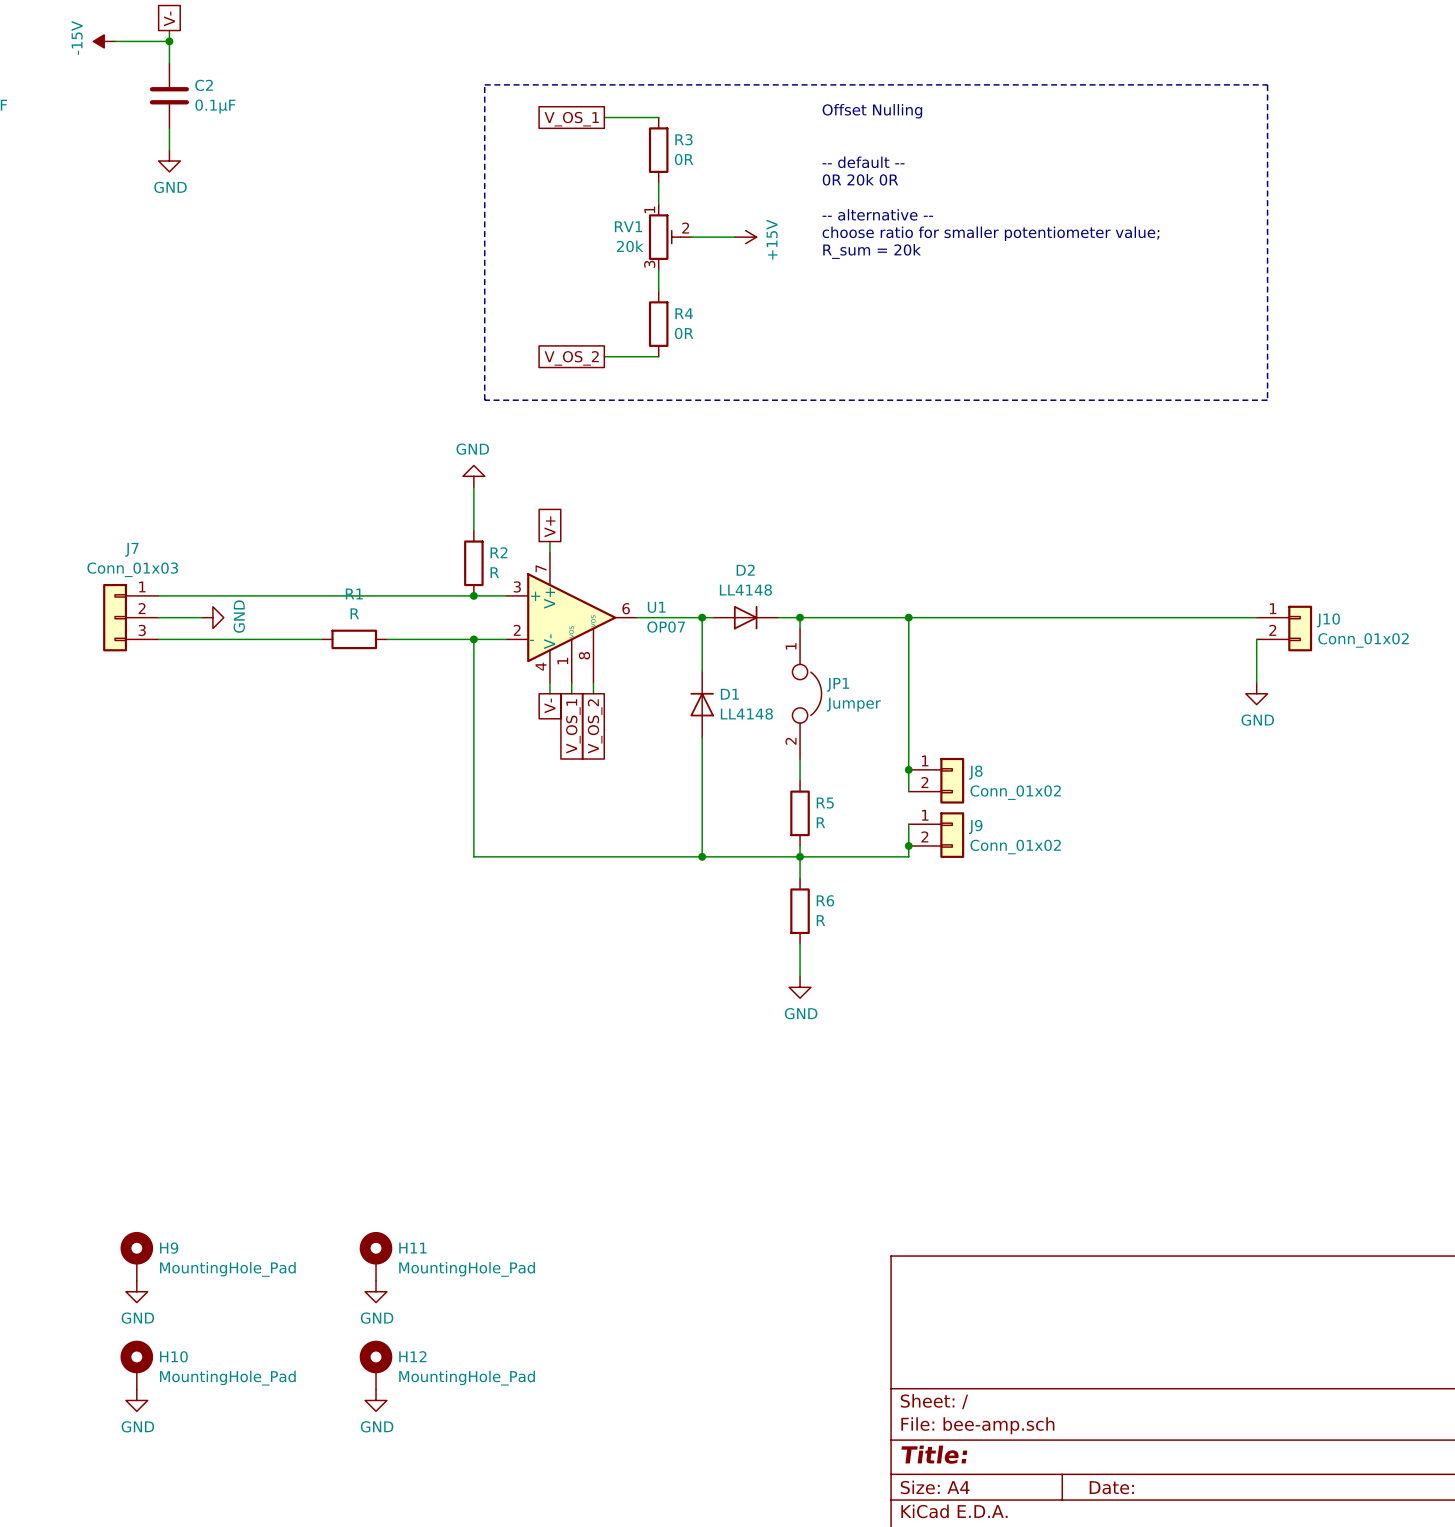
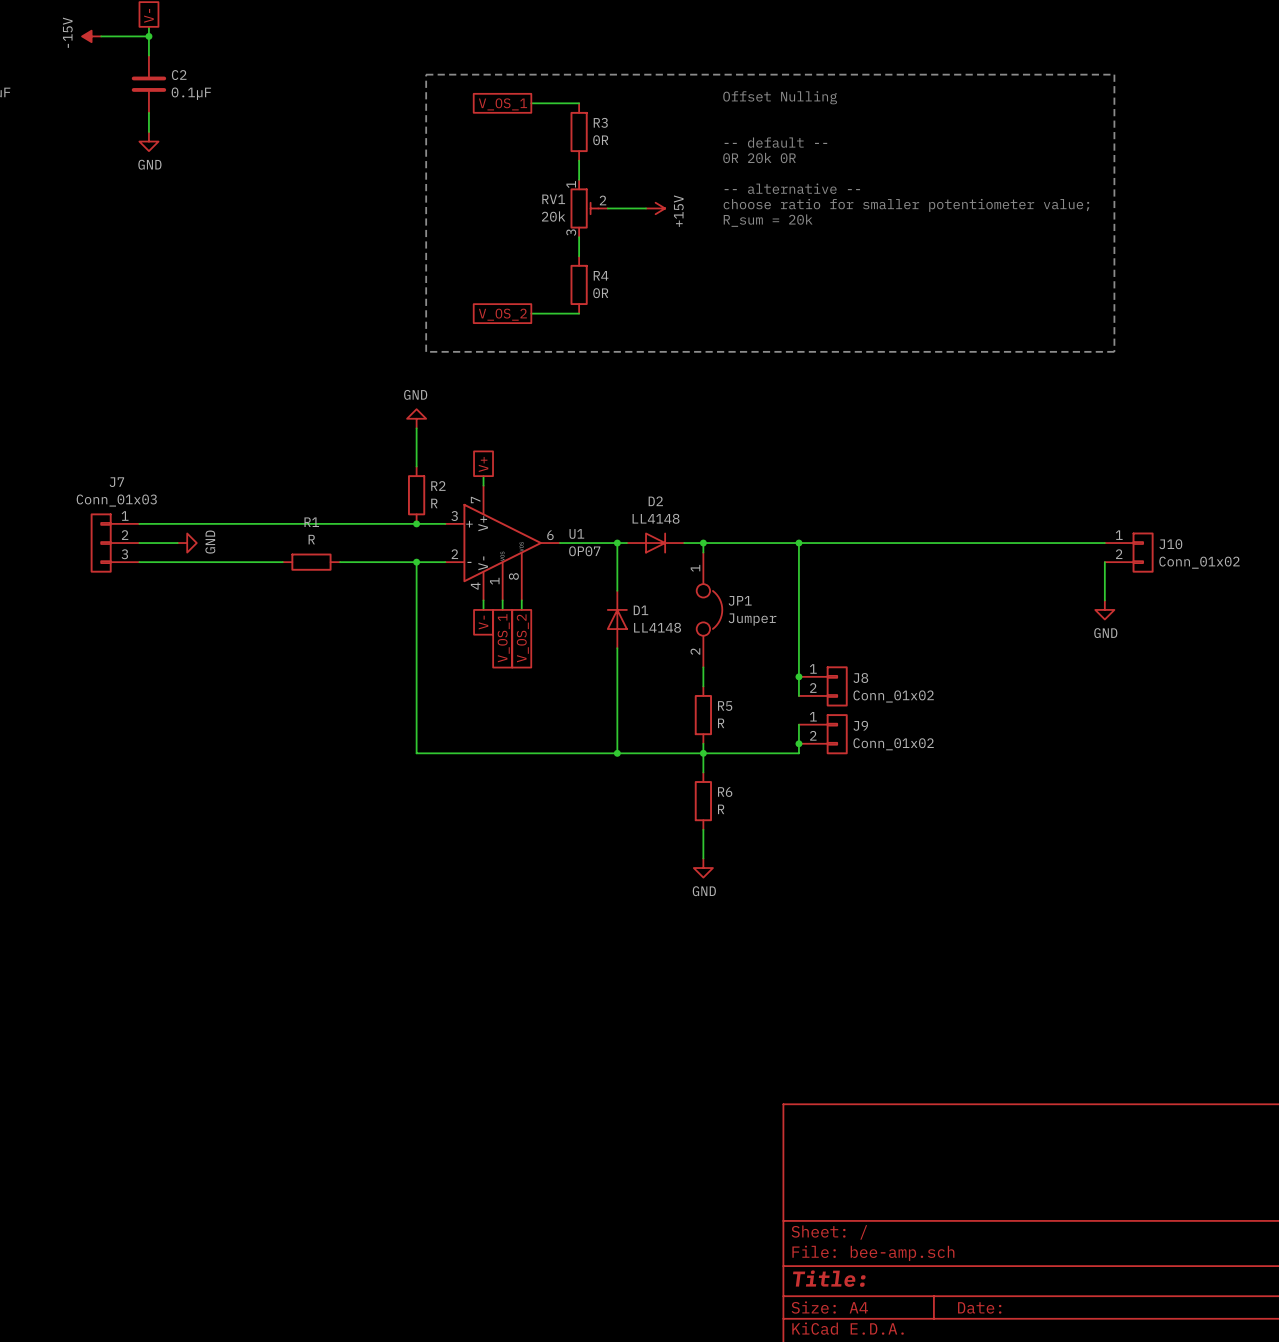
H9: MountingHole_Pad (136, 1256) -> none
H11: MountingHole_Pad (376, 1256) -> none
power symbol: GND (136, 1291) -> none
power symbol: GND (376, 1291) -> none
H10: MountingHole_Pad (136, 1365) -> none
H12: MountingHole_Pad (376, 1365) -> none
power symbol: GND (136, 1400) -> none
power symbol: GND (376, 1400) -> none

